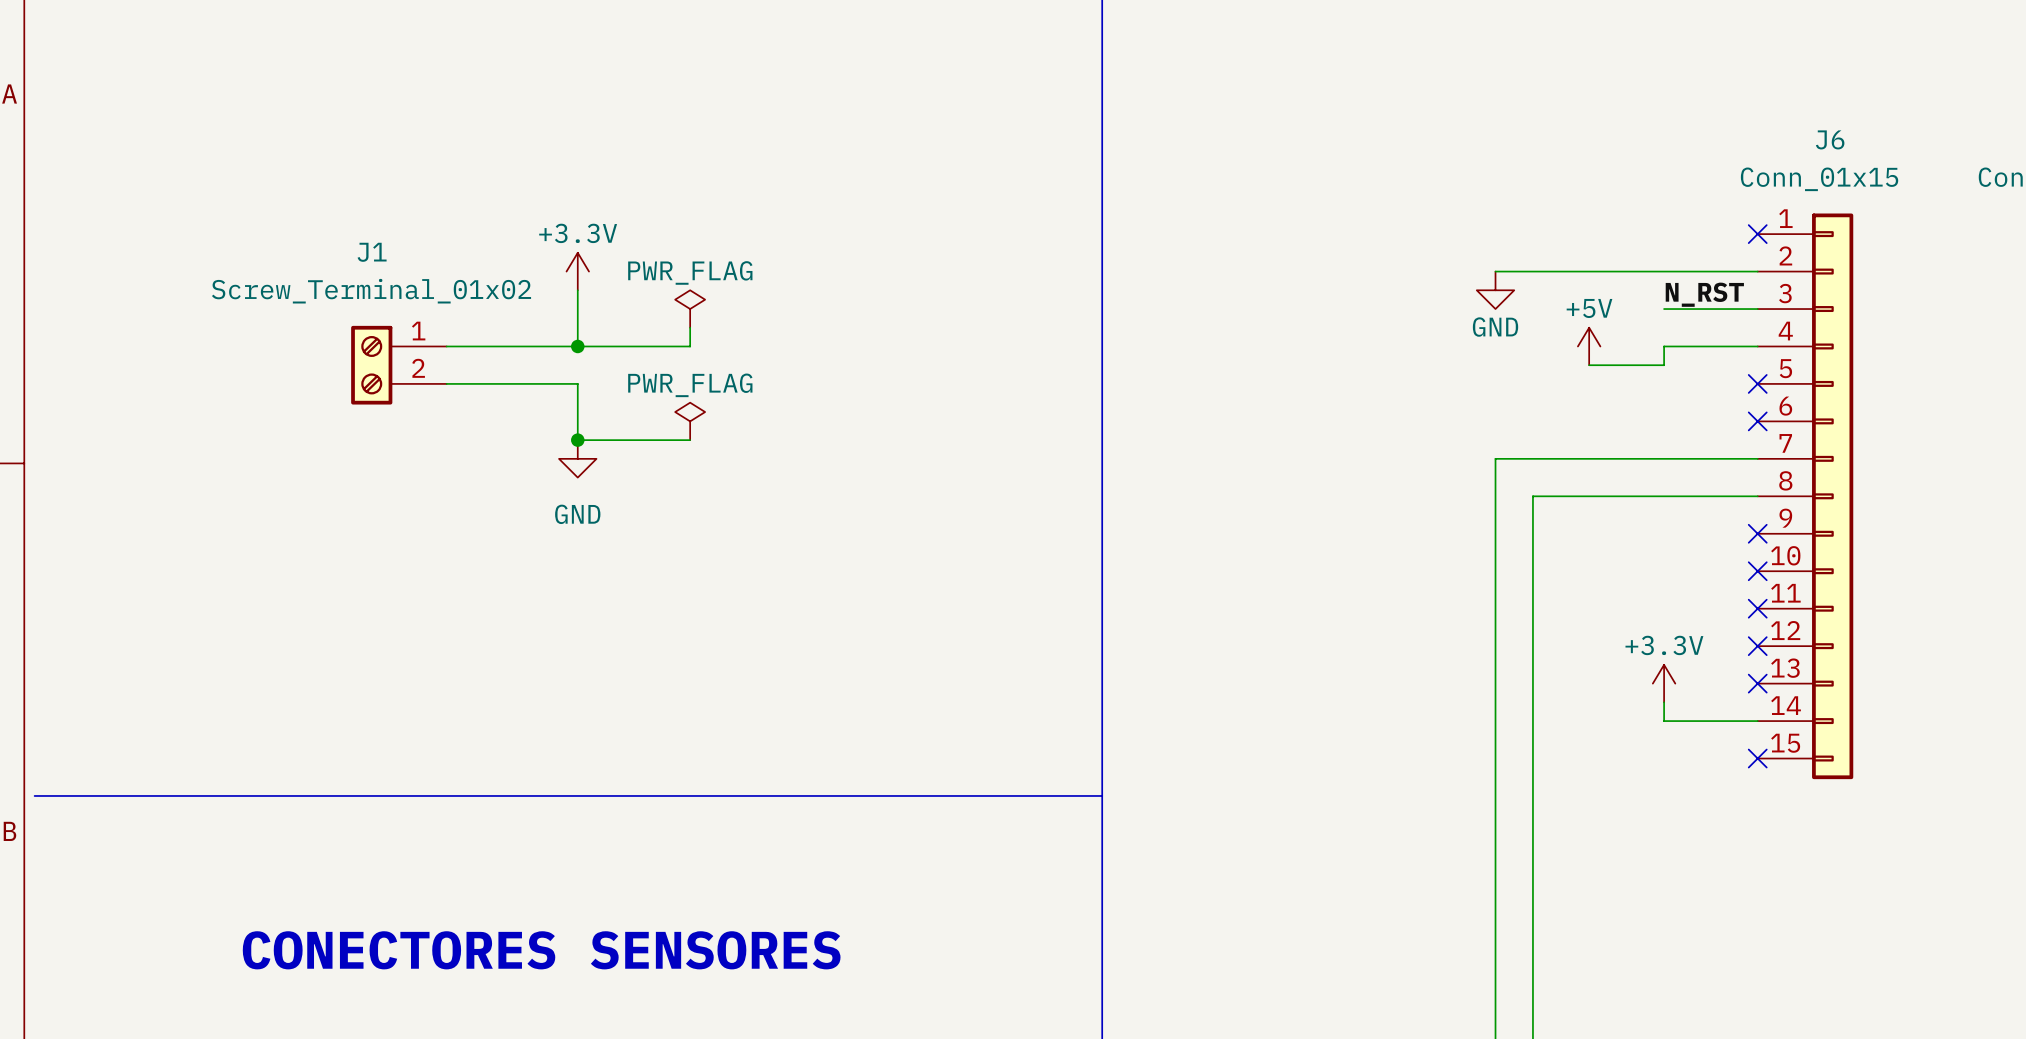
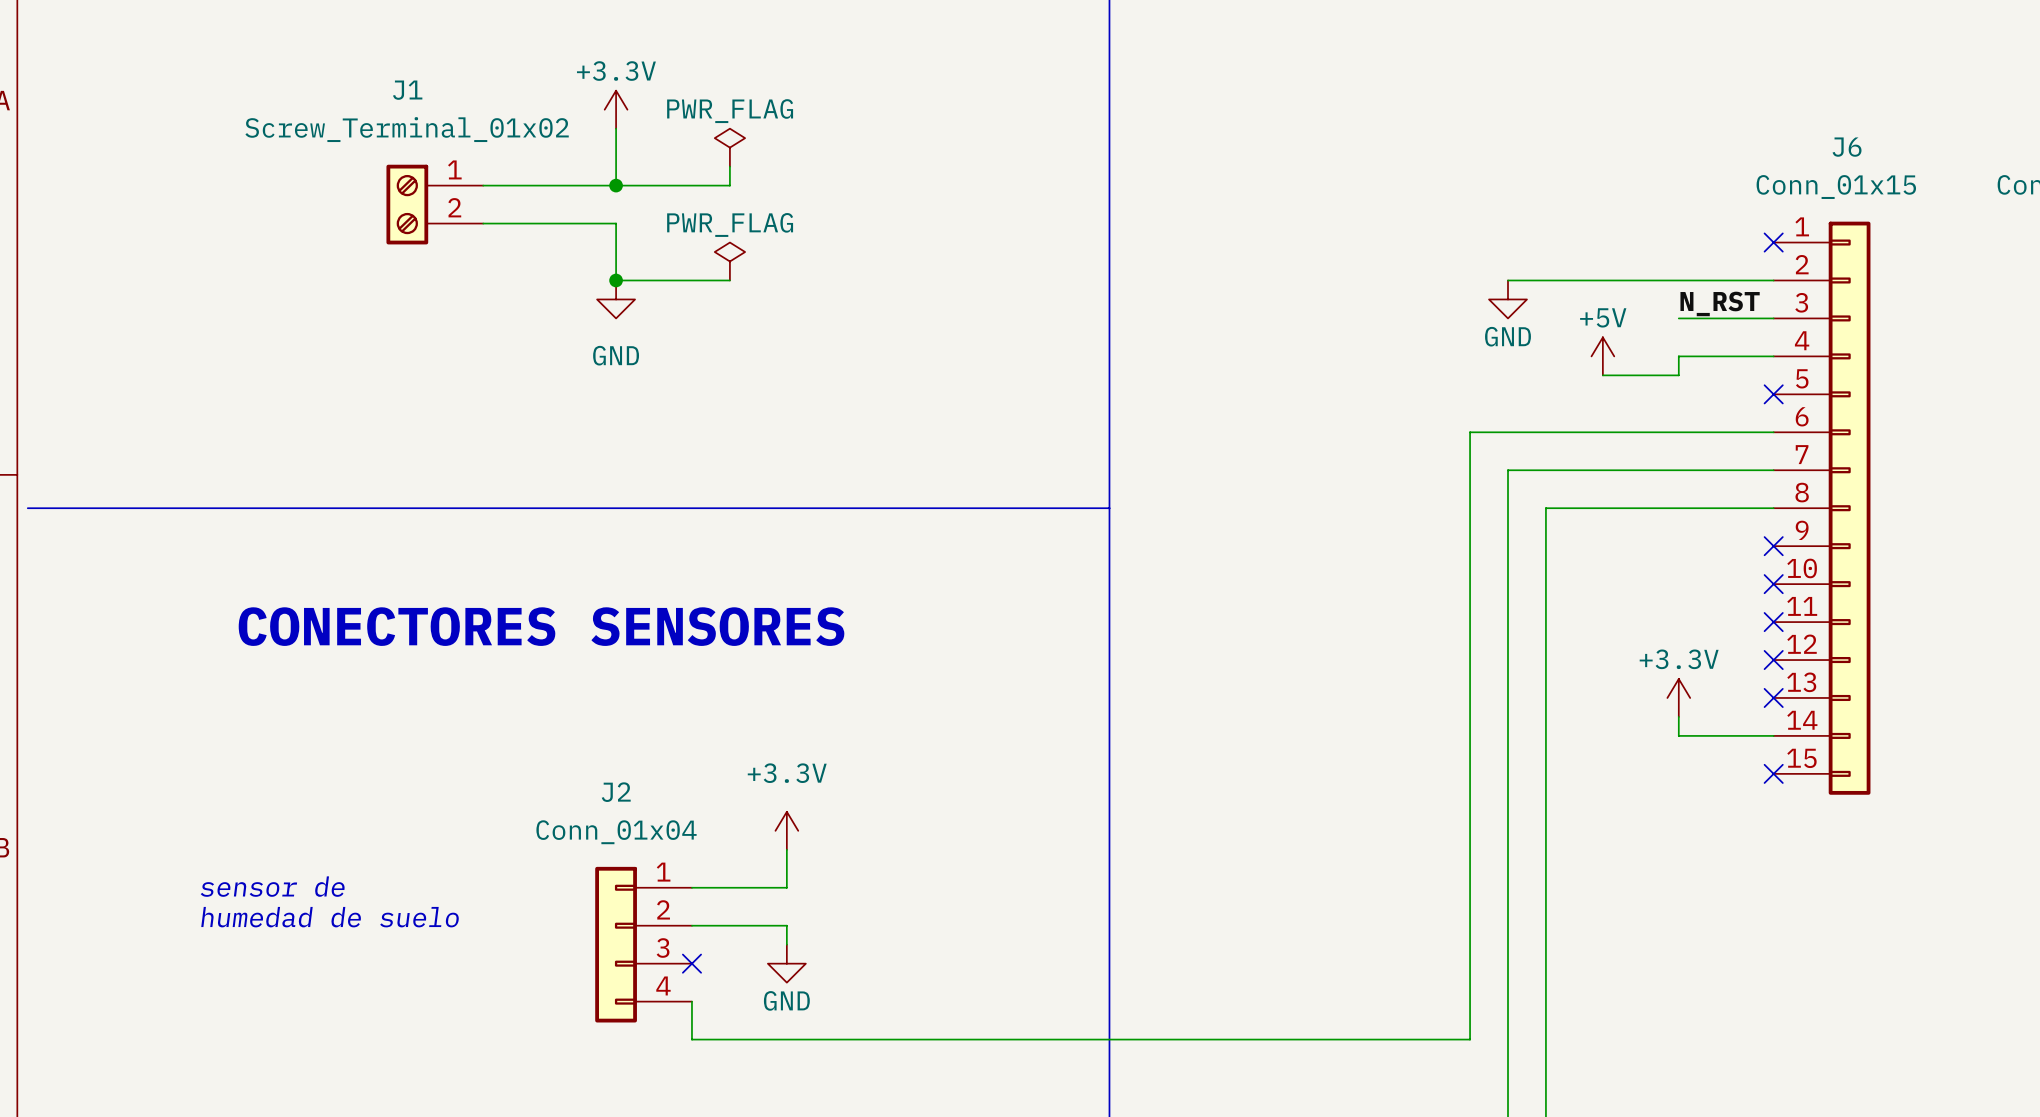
power symbol: none -> PWR_FLAG (729, 147)
junction: none -> (616, 185)
power symbol position: +3.3V (577, 271) -> +3.3V (616, 109)
wire: (577, 290) (577, 346) -> (616, 128) (616, 185)
power symbol position: PWR_FLAG (690, 309) -> PWR_FLAG (729, 261)
wire: (690, 327) (690, 346) (446, 346) -> (729, 166) (729, 185) (483, 185)
junction position: (577, 346) -> (616, 280)
J1 position: (398, 365) -> (434, 204)
wire: (446, 383) (577, 383) (577, 440) (690, 440) -> (483, 223) (616, 223) (616, 280) (729, 280)
power symbol: PWR_FLAG (690, 421) -> none
wire: none -> (1773, 432) (1470, 432) (1470, 1039) (691, 1039) (691, 1001)
no-connect mark: (1757, 421) -> none
junction: (577, 440) -> none
power symbol position: GND (577, 458) -> GND (616, 299)
line: (34, 795) (1102, 795) -> (27, 508) (1109, 508)
power symbol: none -> +3.3V (786, 830)
wire: none -> (786, 849) (786, 887) (691, 887)
text: none -> sensor de (272, 886)
text: none -> humedad de suelo (330, 917)
wire: none -> (691, 925) (786, 925) (786, 944)
J2: none -> Conn_01x04 (643, 944)
no-connect mark: none -> (691, 963)
power symbol: none -> GND (786, 963)
text position: CONECTORES SENSORES (541, 950) -> CONECTORES SENSORES (541, 626)

